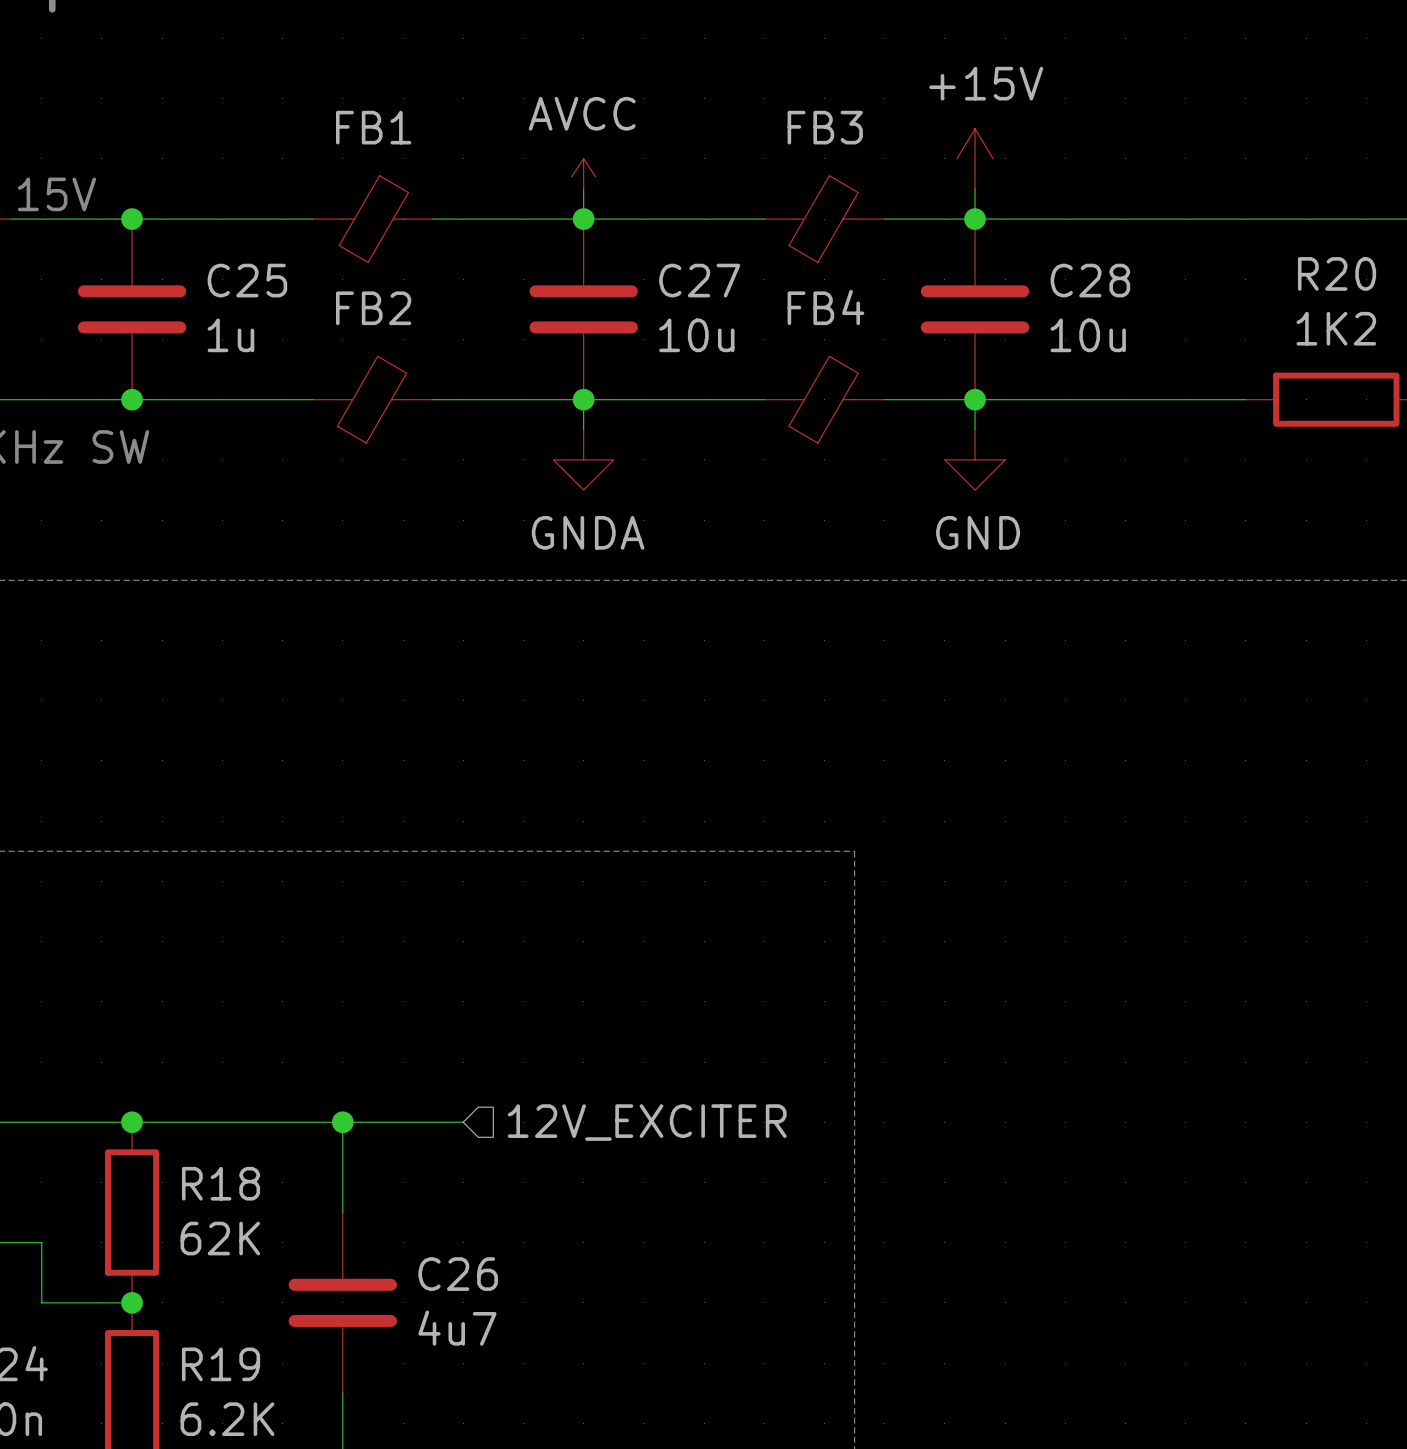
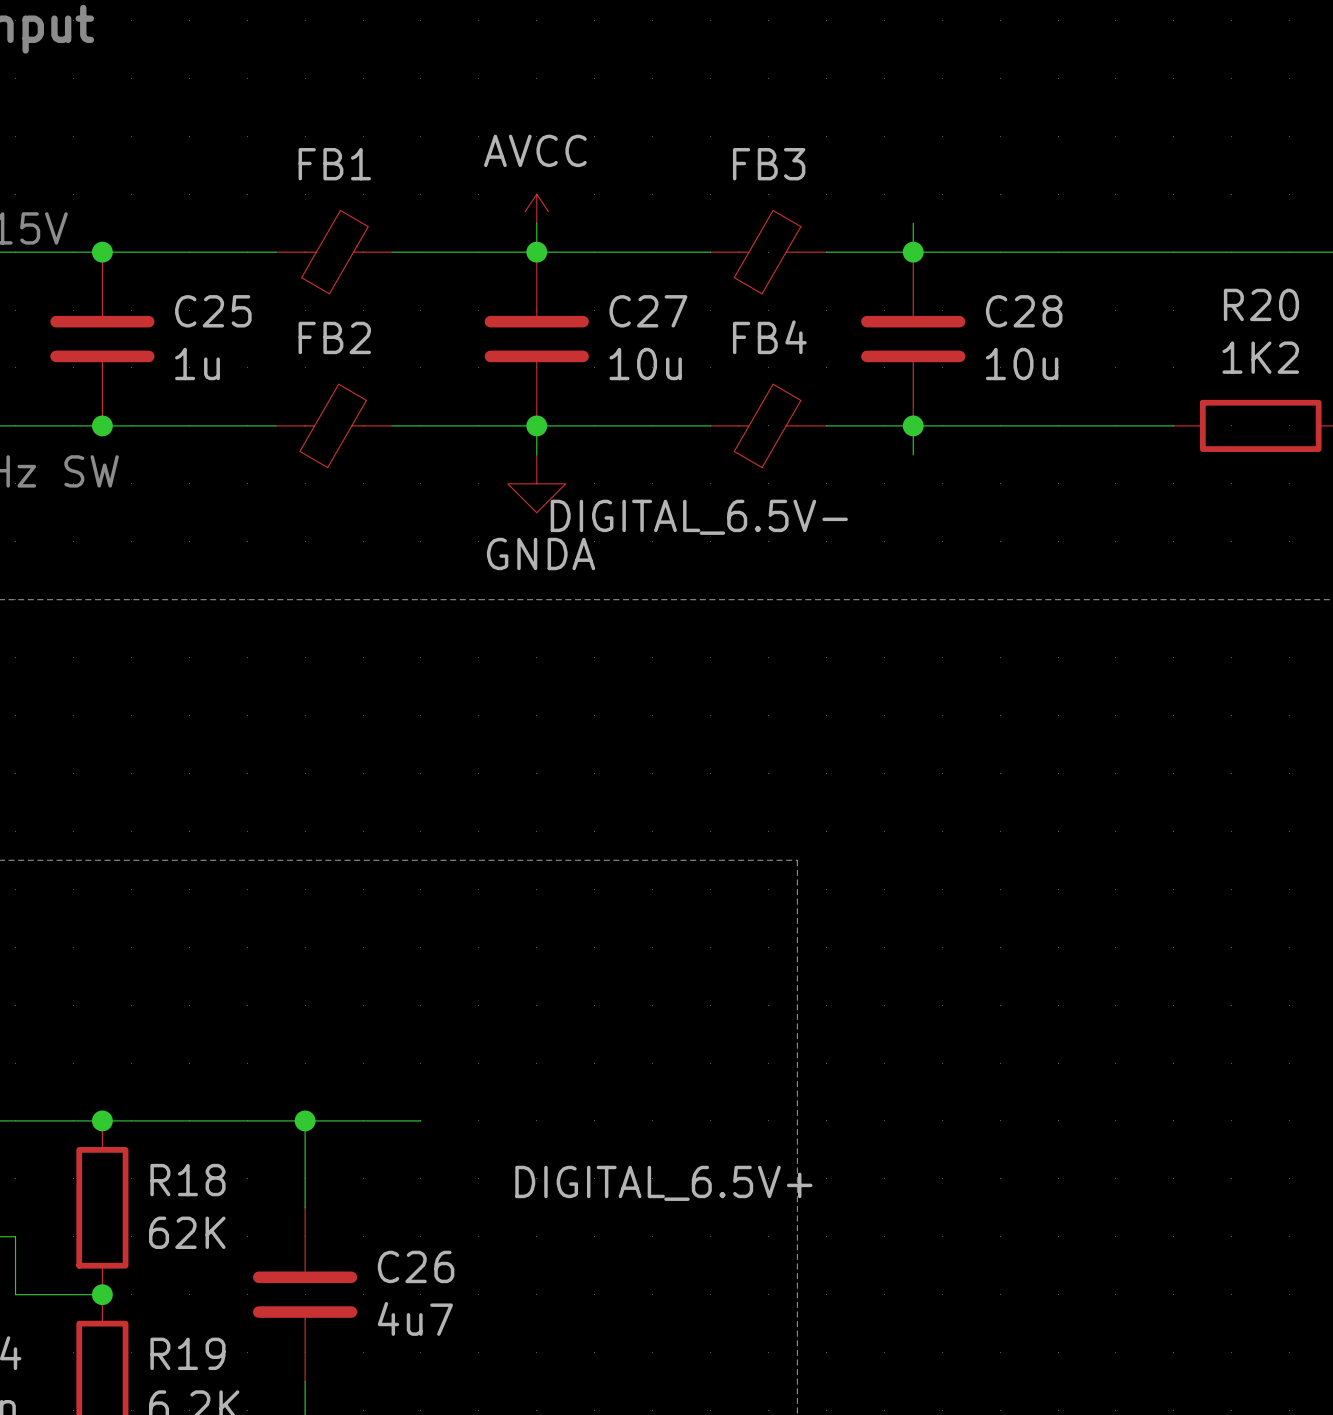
power symbol: +15V (975, 158) -> none
power symbol: GND (975, 459) -> none
label: none -> DIGITAL_6.5V- (699, 517)
hierarchical label: 12V_EXCITER (647, 1122) -> none
label: none -> DIGITAL_6.5V+ (663, 1183)

